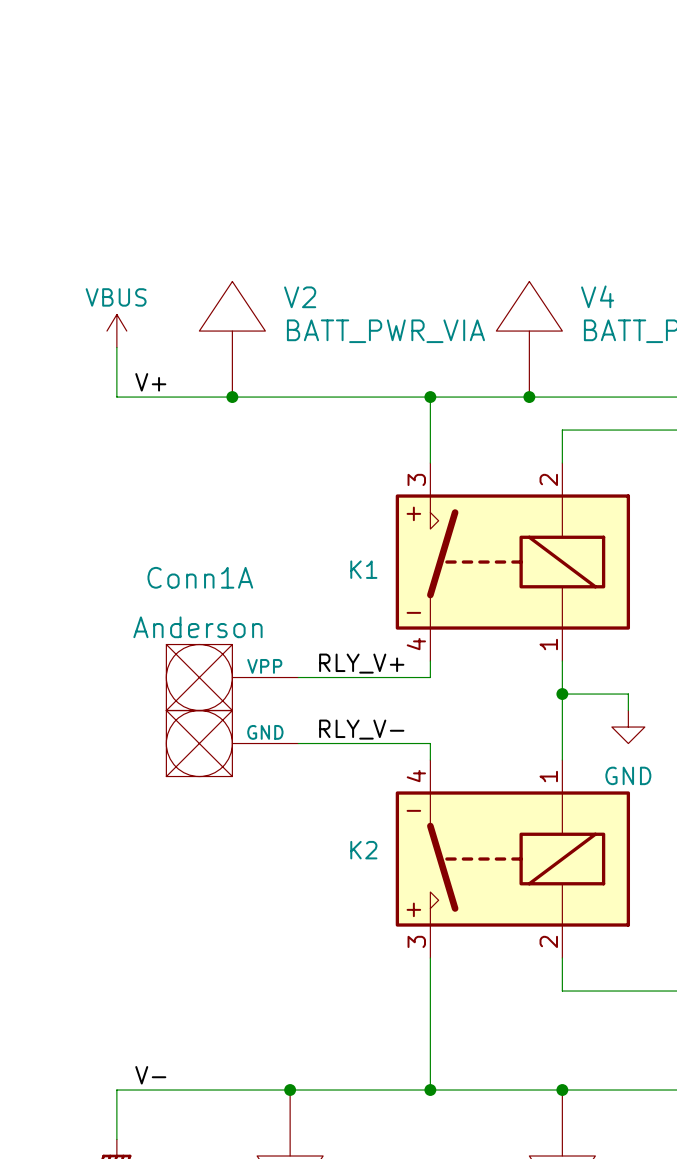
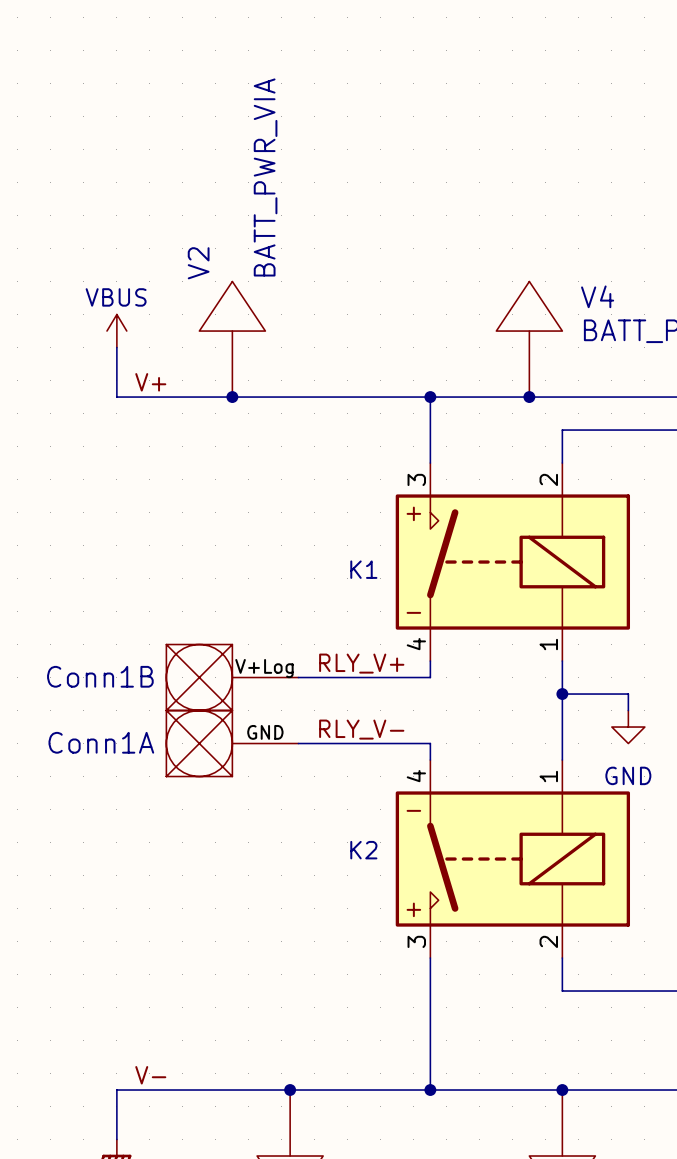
V2 name rotation: 0° (300, 297) -> 90° counterclockwise (198, 263)
V2 name position: V2 (300, 297) -> V2 (198, 263)
V2 value rotation: 0° (385, 331) -> 90° counterclockwise (265, 177)
Conn1A name position: Conn1A (200, 577) -> Conn1A (101, 742)
Conn1A value: Anderson (197, 627) -> none
Conn1A symbol: [166, 644, 299, 777] -> [166, 710, 299, 777]
Conn1B: none -> (232, 677)

